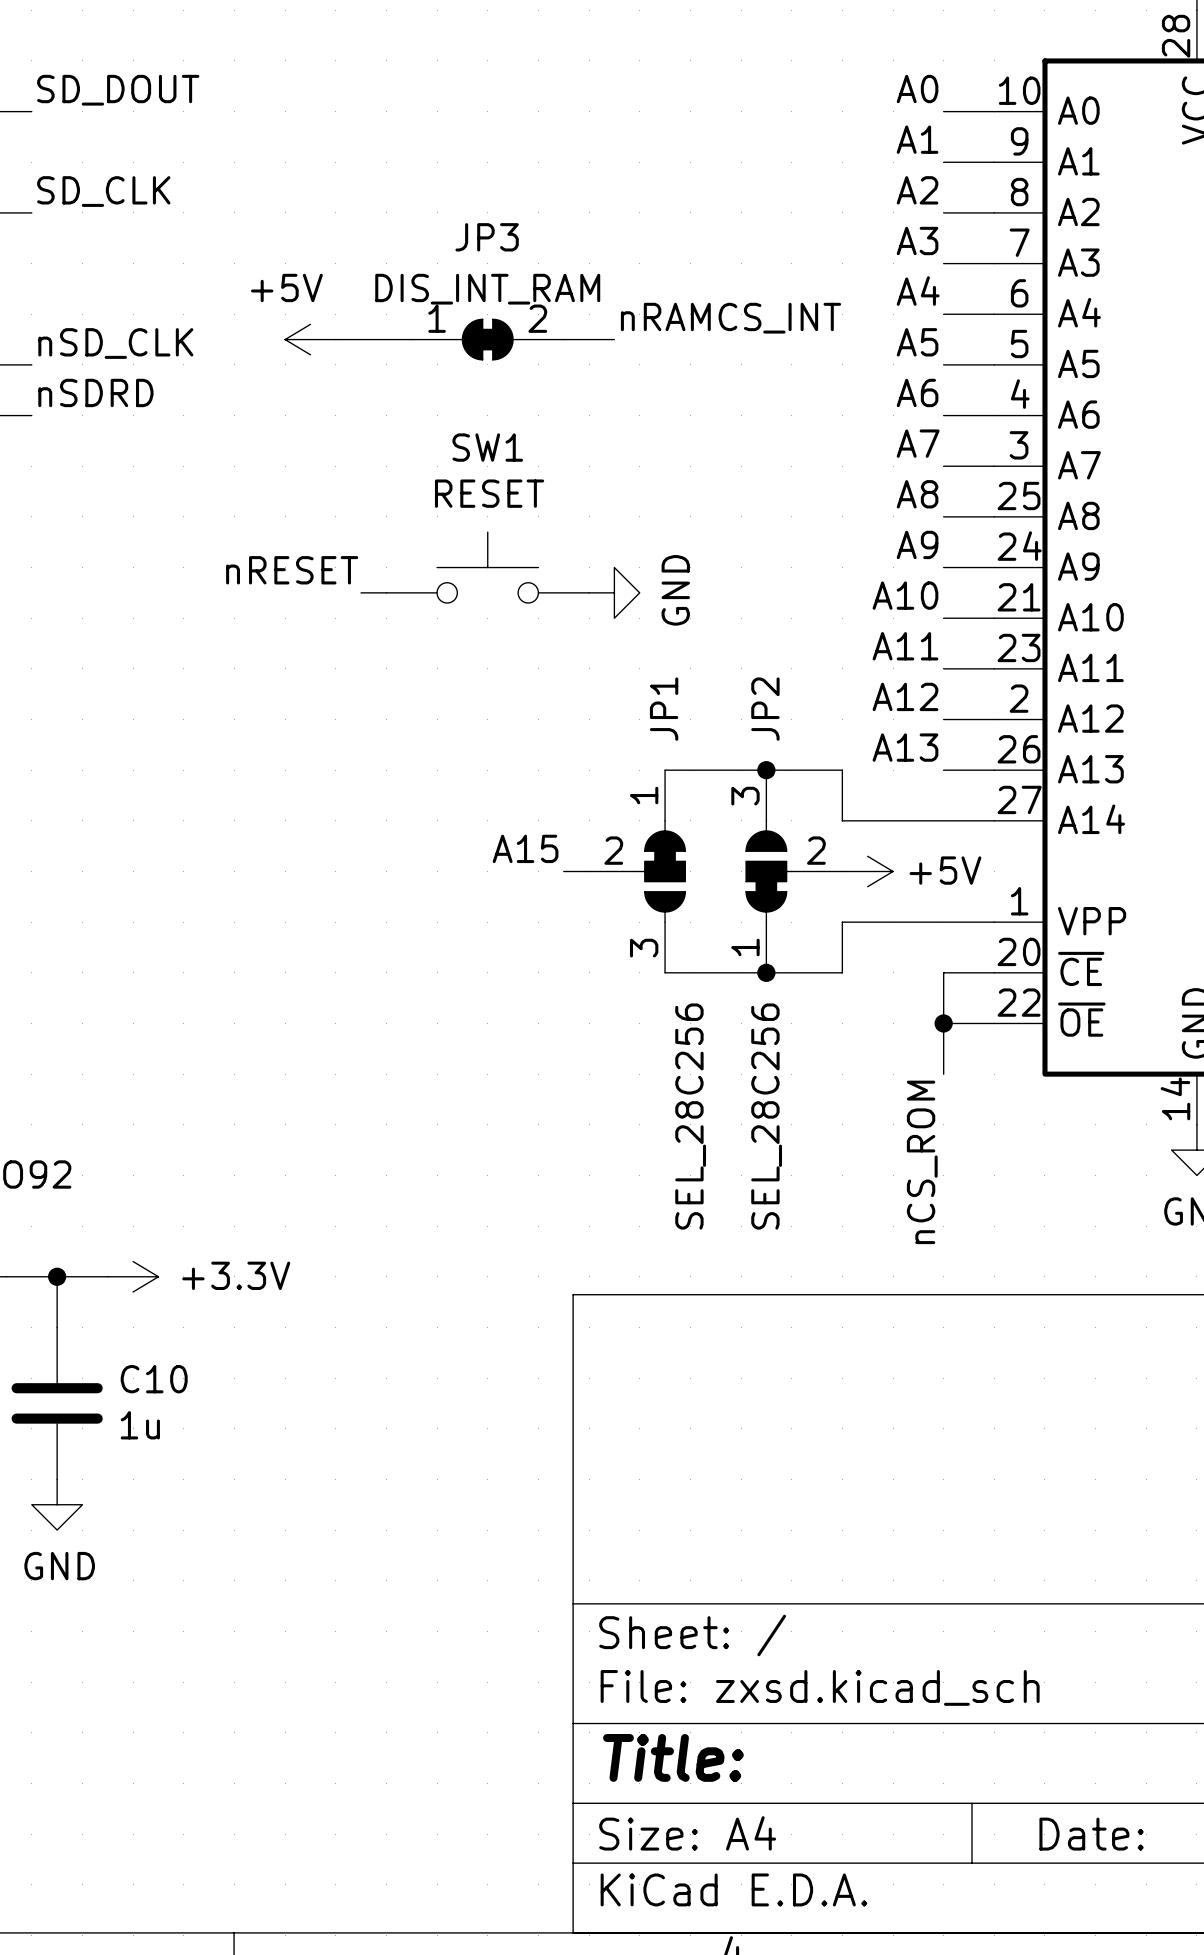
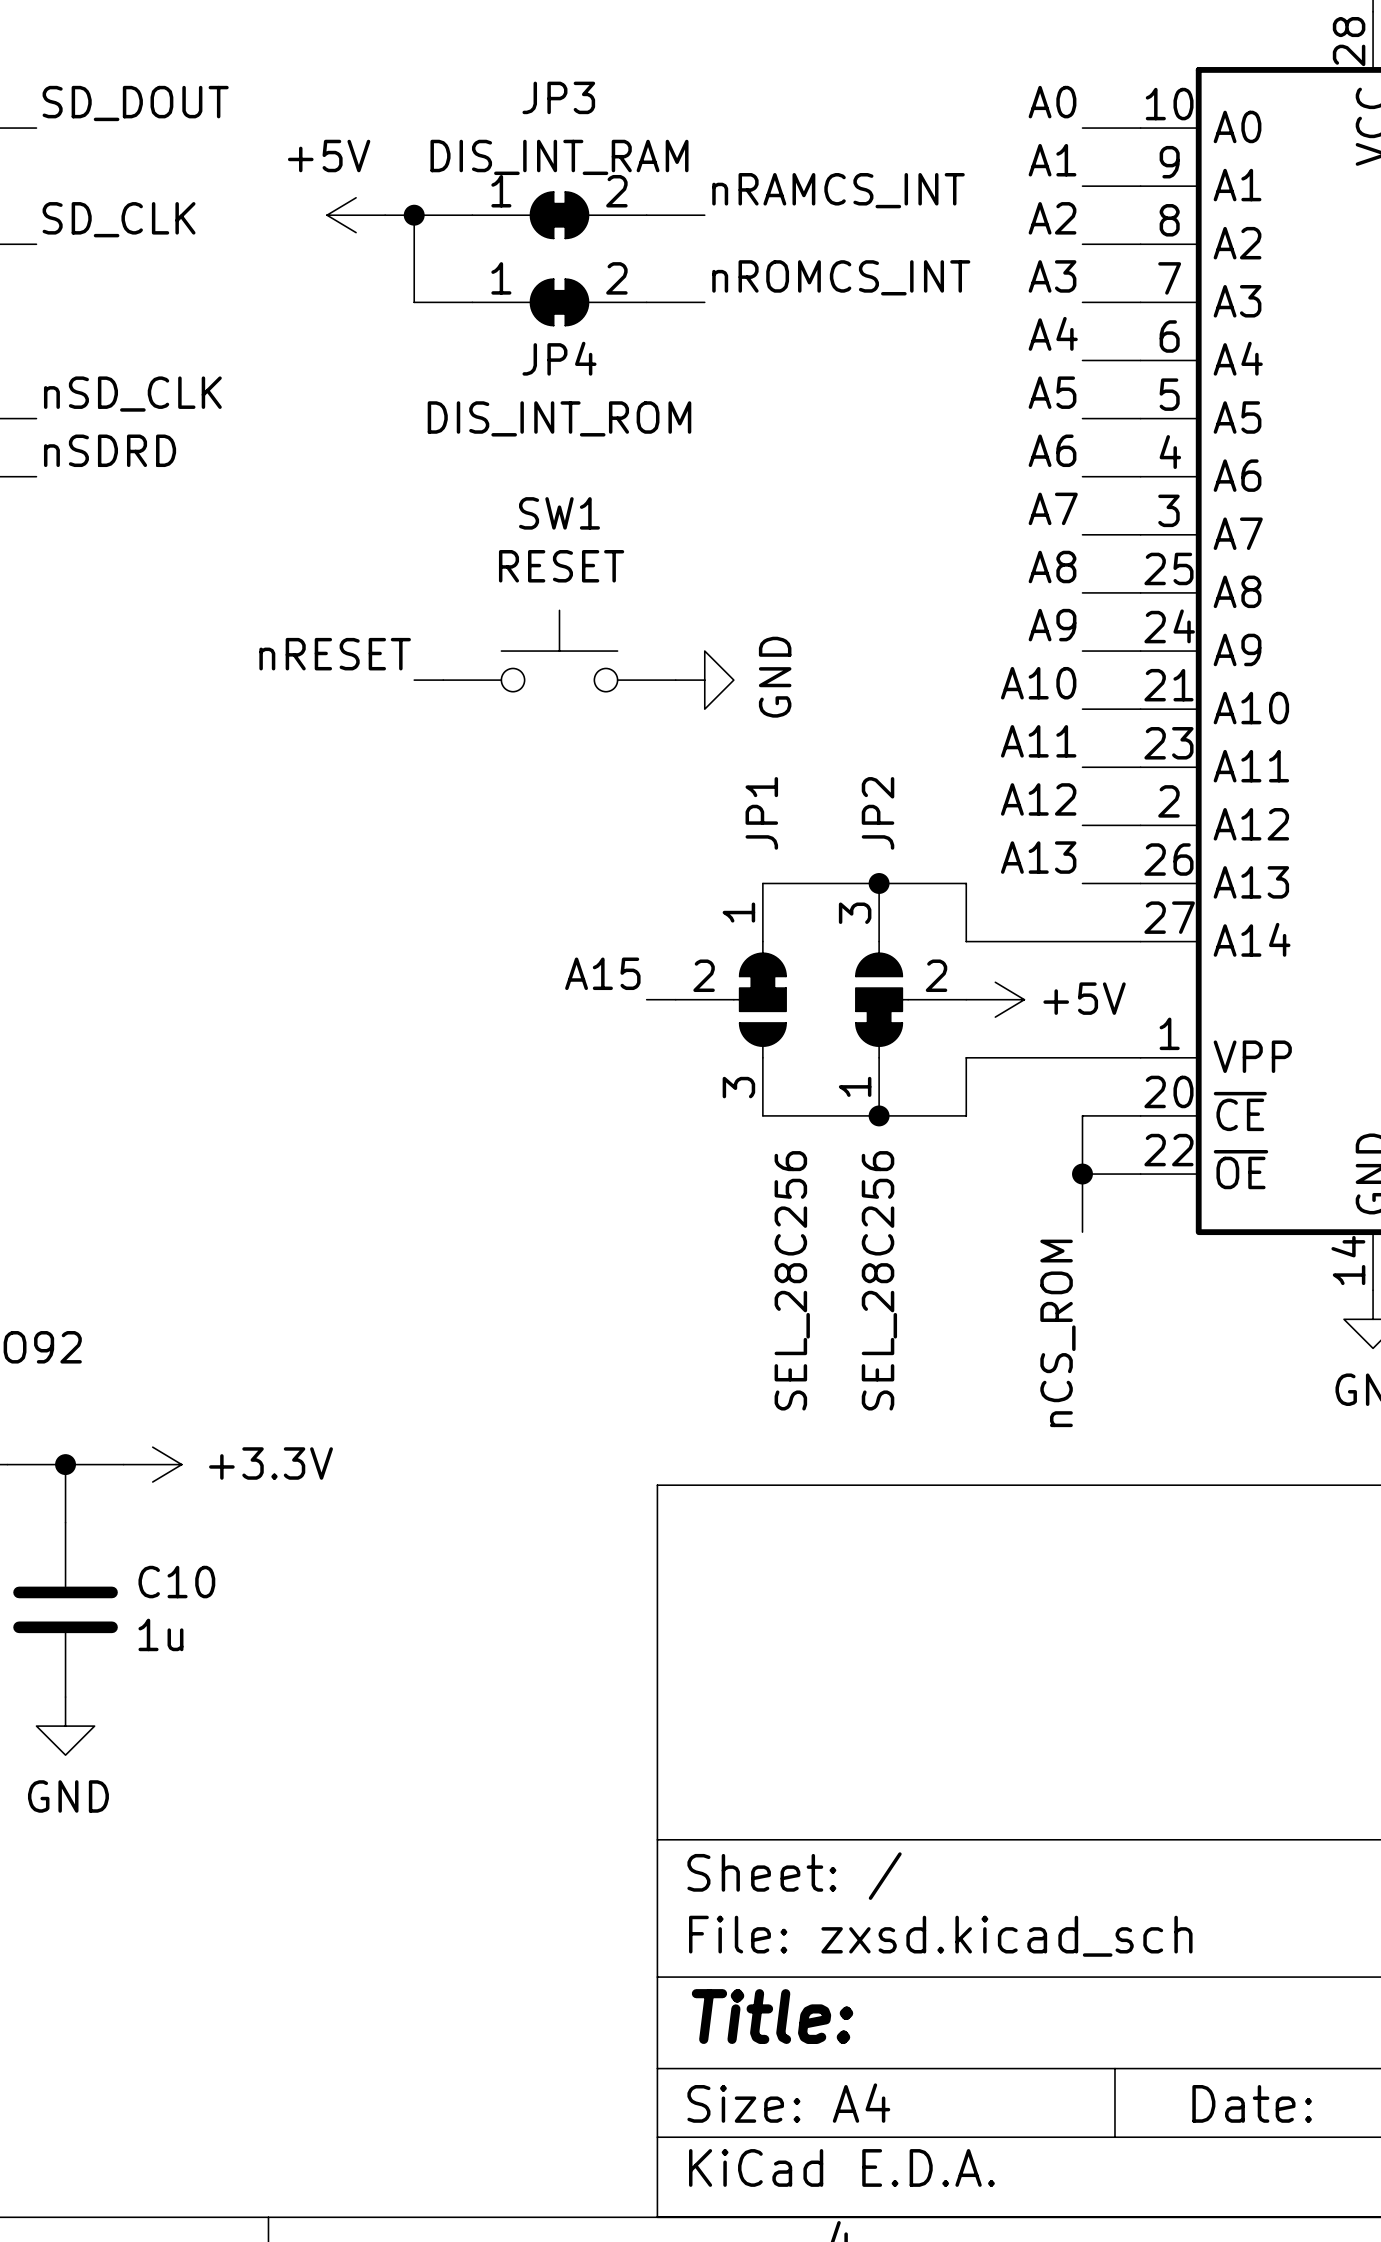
wire: none -> (414, 215) (414, 302) (472, 302)
junction: none -> (414, 215)
wire: none -> (646, 215) (704, 215)
label: none -> nROMCS_INT (841, 277)
JP4: none -> DIS_INT_ROM (559, 302)
label position: nRAMCS_INT (730, 318) -> nRAMCS_INT (838, 190)
power symbol position: +5V (310, 339) -> +5V (356, 215)
wire: (335, 339) (411, 339) -> (385, 215) (472, 215)
JP3 position: (487, 339) -> (559, 215)
wire: (563, 339) (614, 339) -> (646, 302) (704, 302)

